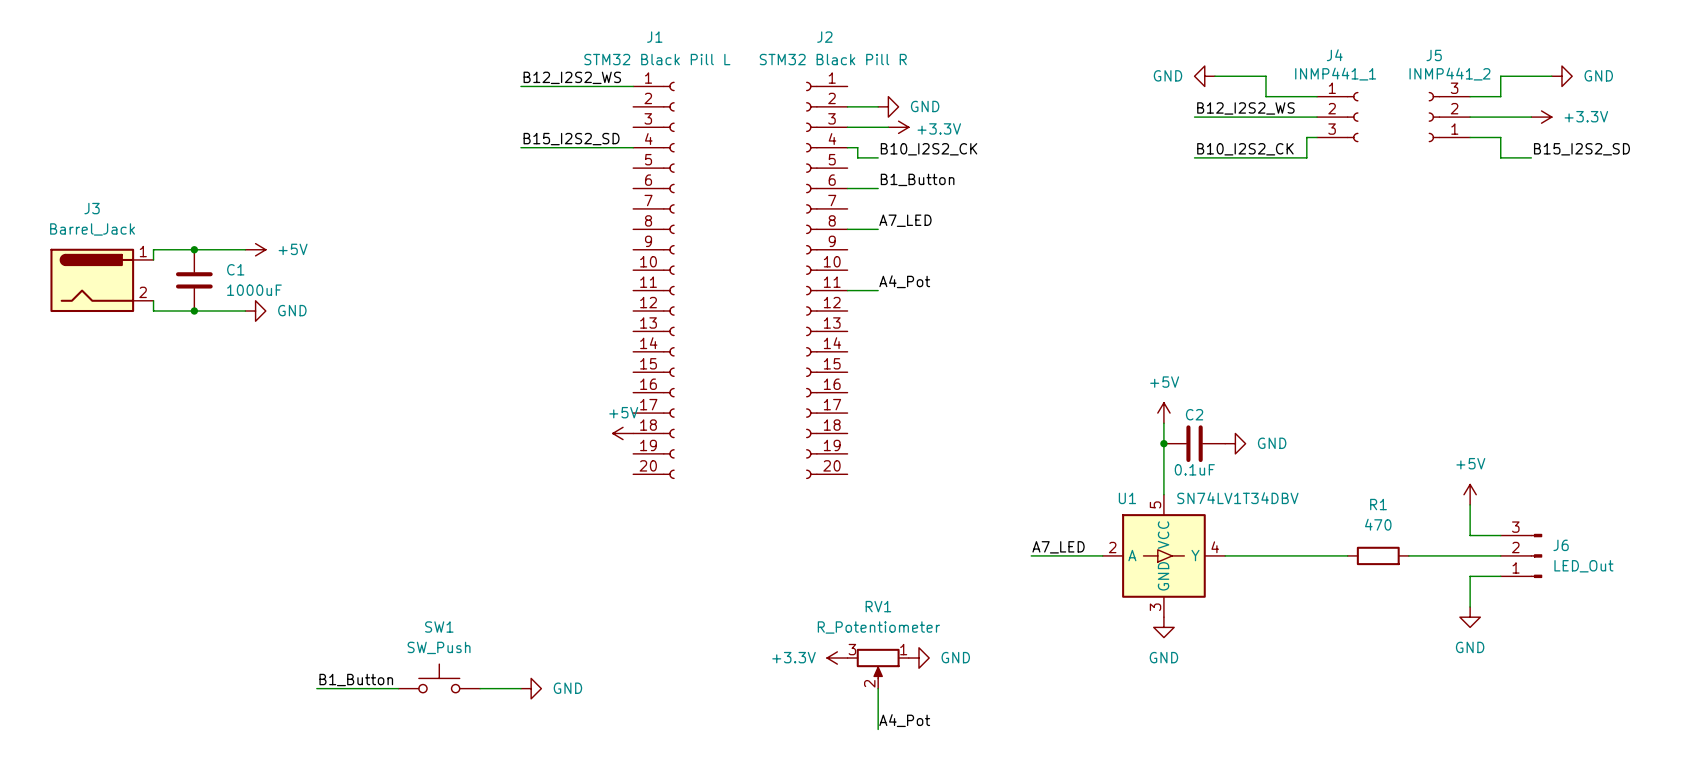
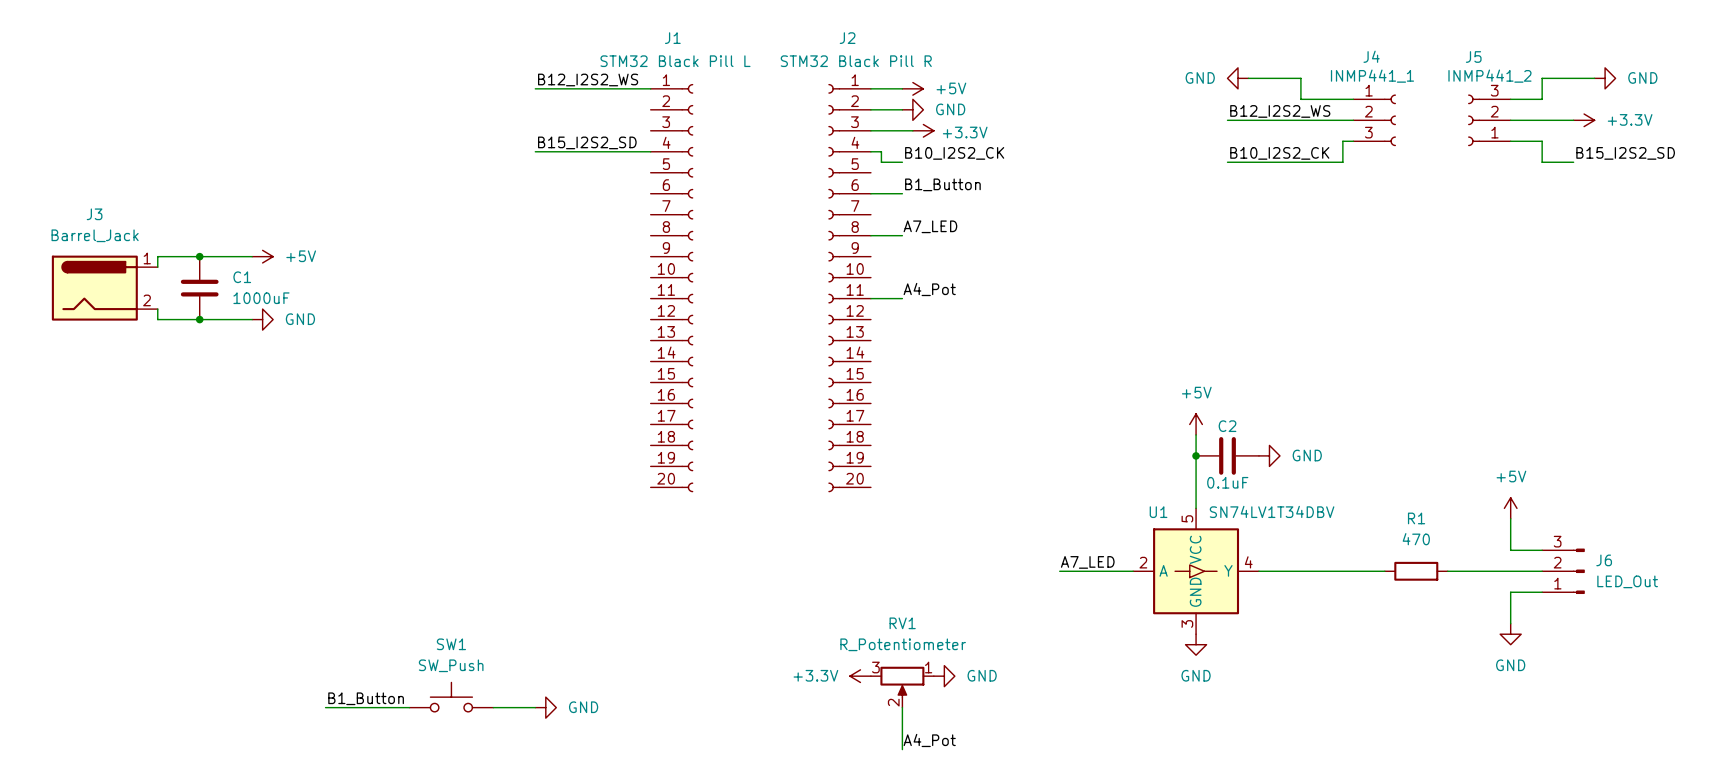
wire: none -> (870, 88) (902, 88)
power symbol: none -> +5V (912, 88)
power symbol: +5V (623, 433) -> none

